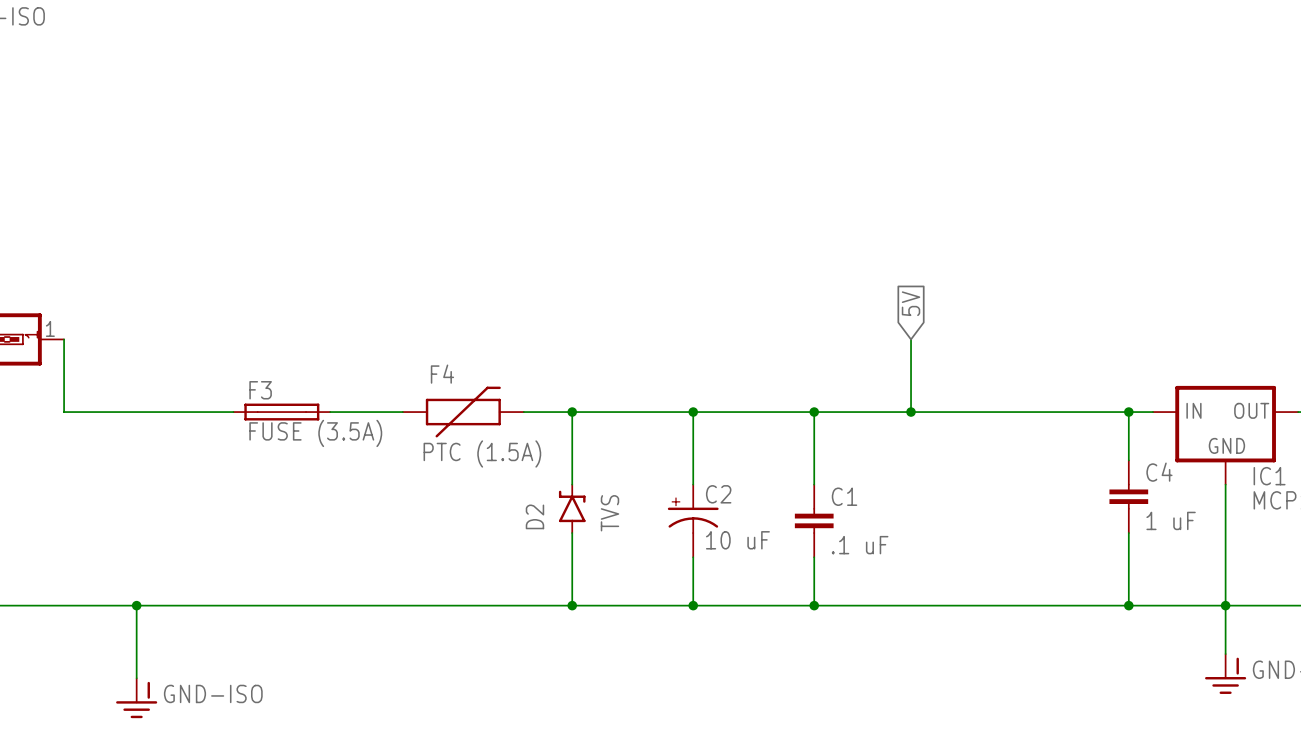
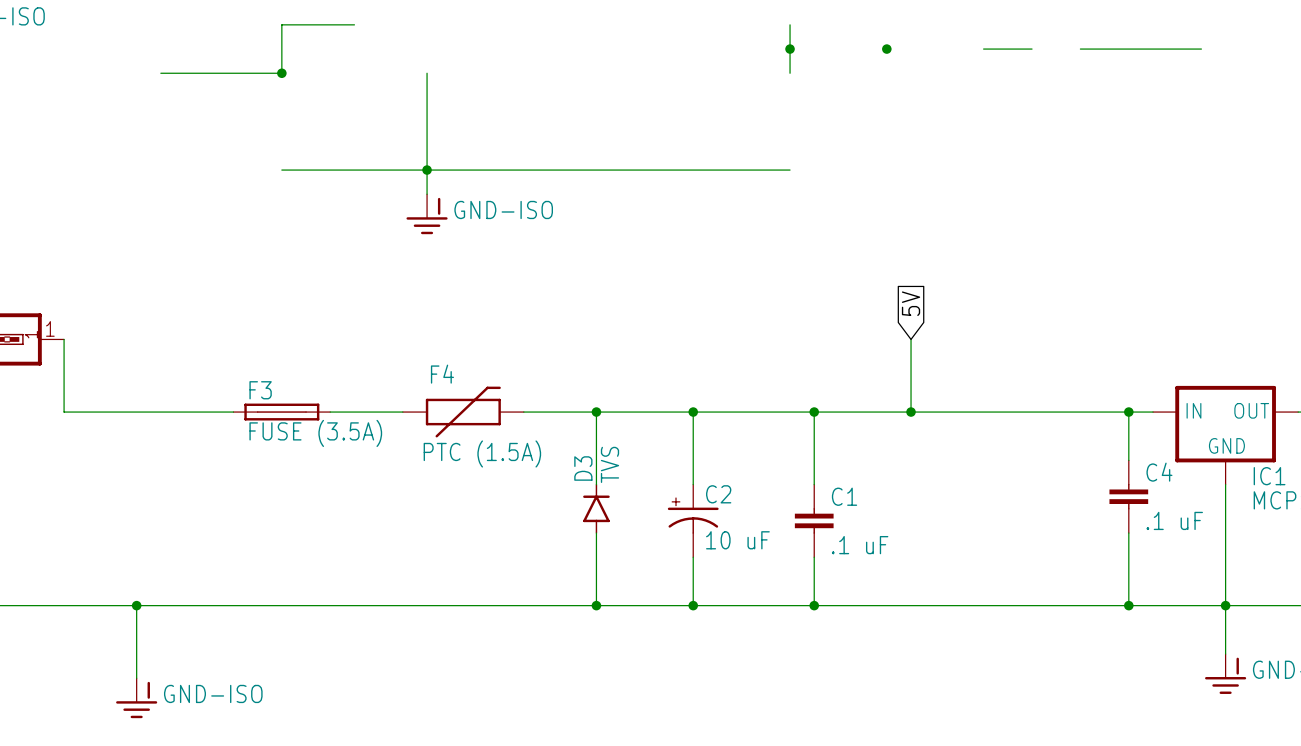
wire: none -> (354, 24) (281, 24) (281, 73) (160, 73)
wire: none -> (790, 24) (790, 73)
junction: none -> (790, 49)
junction: none -> (886, 49)
wire: none -> (983, 49) (1032, 49)
wire: none -> (1080, 49) (1201, 49)
junction: none -> (281, 73)
wire: none -> (427, 73) (427, 194)
wire: none -> (281, 170) (790, 170)
junction: none -> (427, 170)
power symbol: none -> GND-ISO (427, 214)
wire: (572, 412) (572, 484) -> (596, 412) (596, 484)
junction position: (572, 412) -> (596, 412)
D2: TVS (572, 508) -> none
D3: none -> TVS (596, 508)
C4 value: 1 uF (1171, 520) -> .1 uF (1174, 520)
wire: (572, 533) (572, 605) -> (596, 533) (596, 605)
junction position: (572, 605) -> (596, 605)

